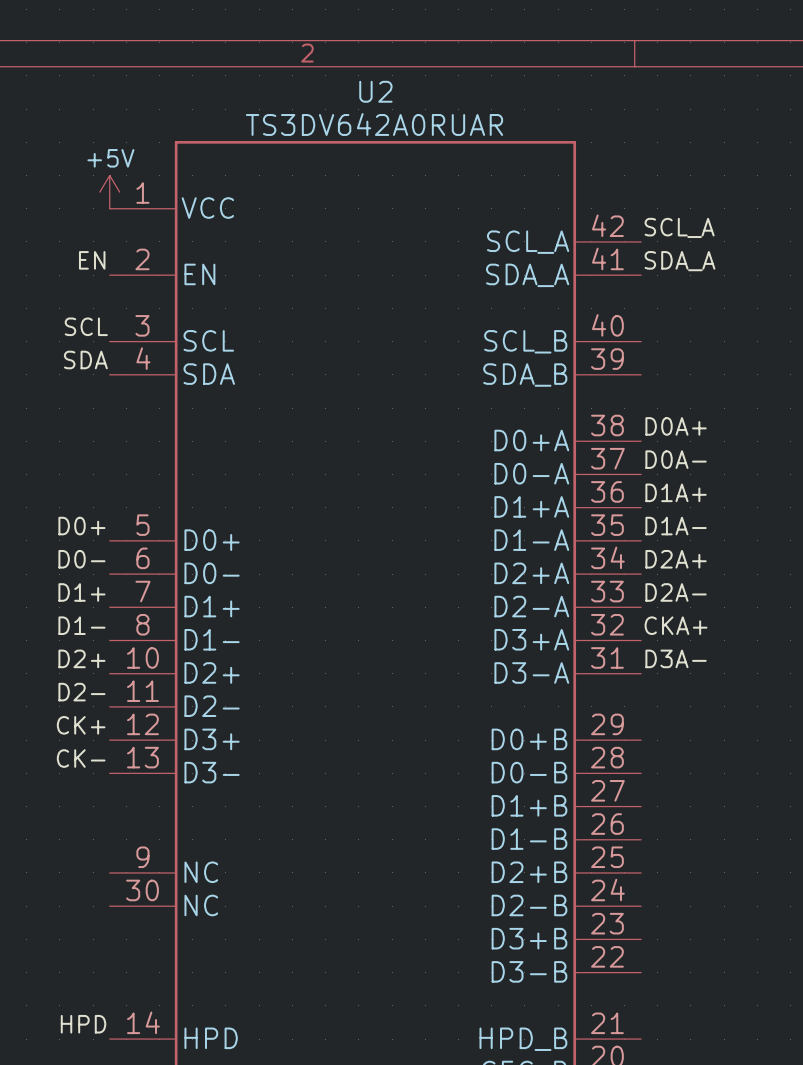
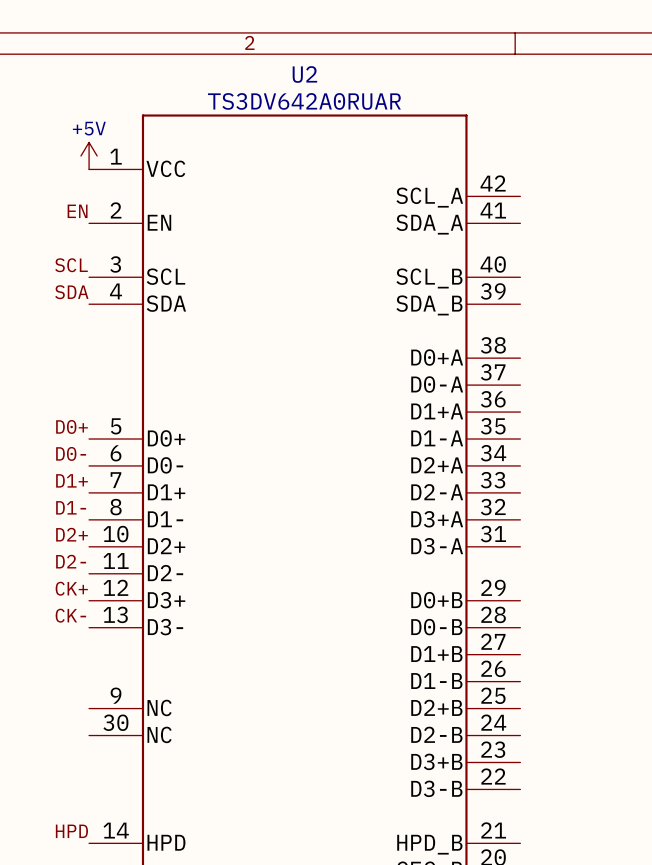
label: SCL_A (679, 227) -> none
label: SDA_A (679, 261) -> none
label: D0A+ (676, 426) -> none
label: D0A- (676, 459) -> none
label: D1A+ (676, 492) -> none
label: D1A- (676, 526) -> none
label: D2A+ (676, 559) -> none
label: D2A- (676, 592) -> none
label: CKA+ (676, 625) -> none
label: D3A- (676, 658) -> none

